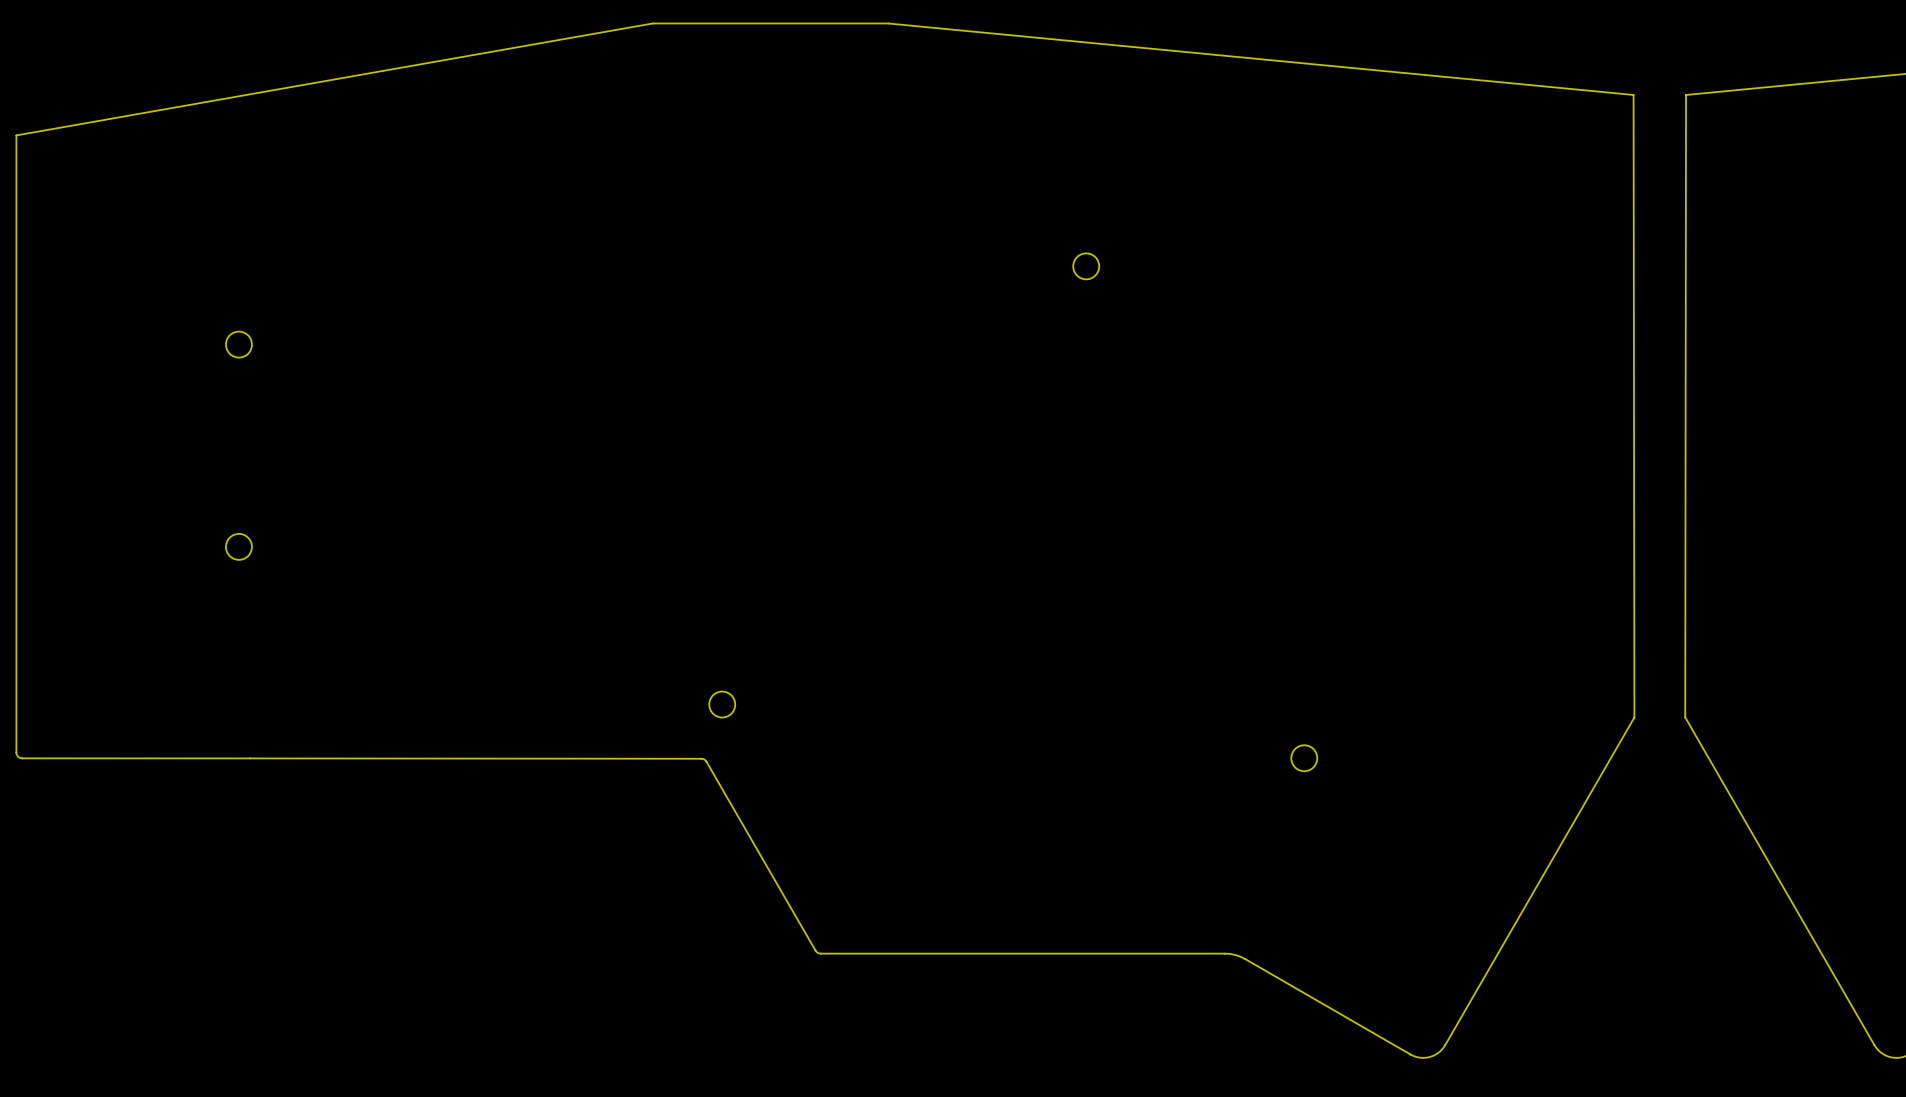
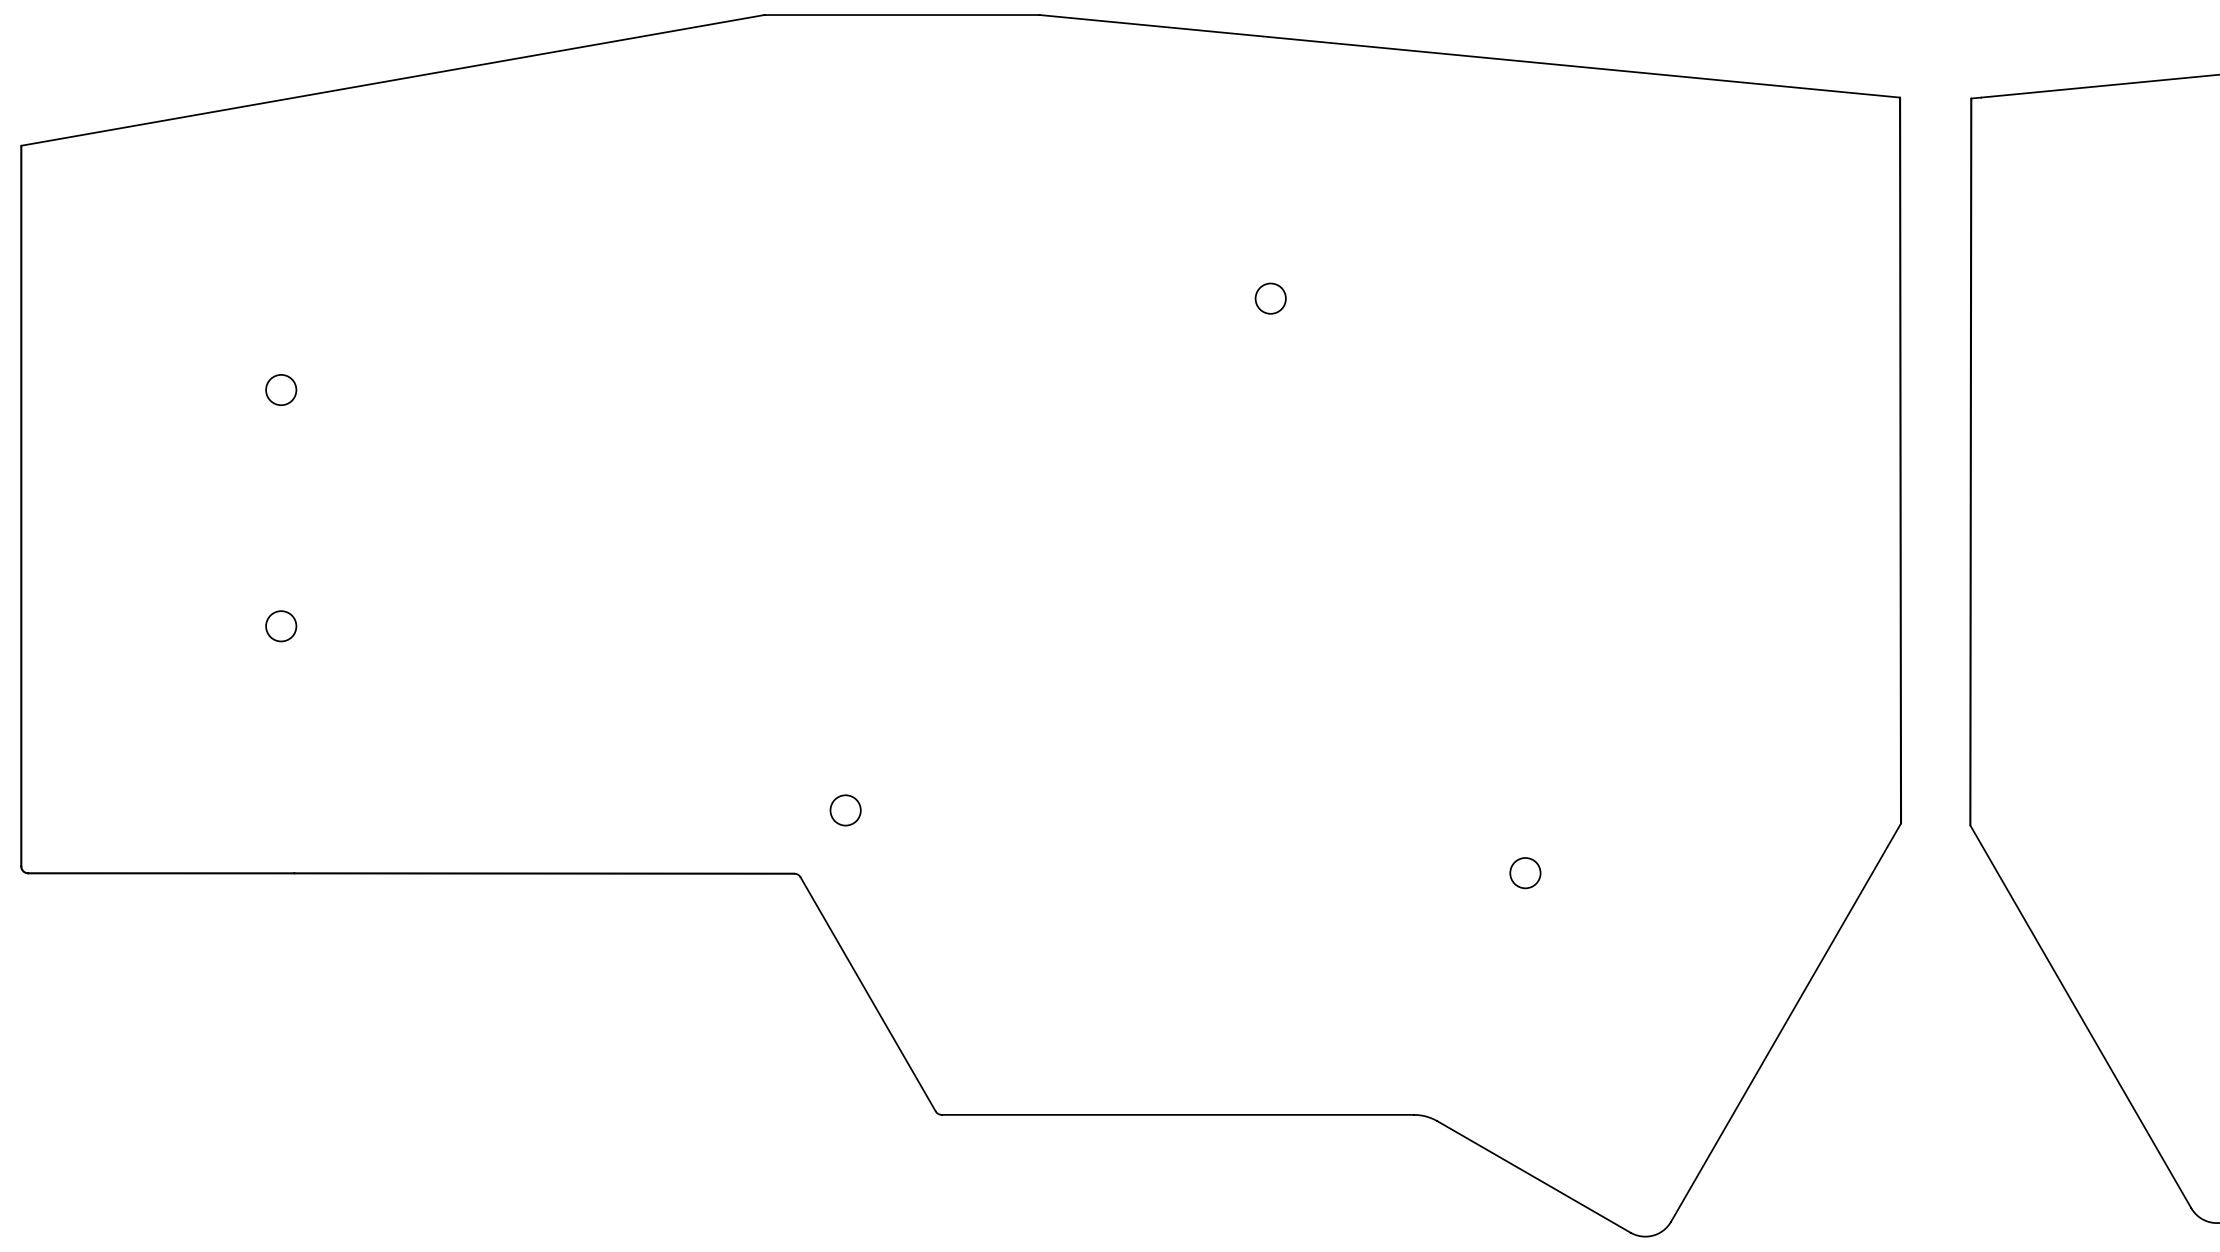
board edge: (1625, 94) (1633, 94) (1634, 717) (1445, 1045) (1437, 1053) (1424, 1057) (1413, 1055) (1245, 959) (1230, 953) (818, 953) (706, 761) (702, 758) (678, 758) -> (1900, 97) (1901, 823) (1671, 1221) (1662, 1231) (1646, 1236) (1633, 1234) (1437, 1121) (1422, 1115) (938, 1114) (800, 877) (794, 873)

